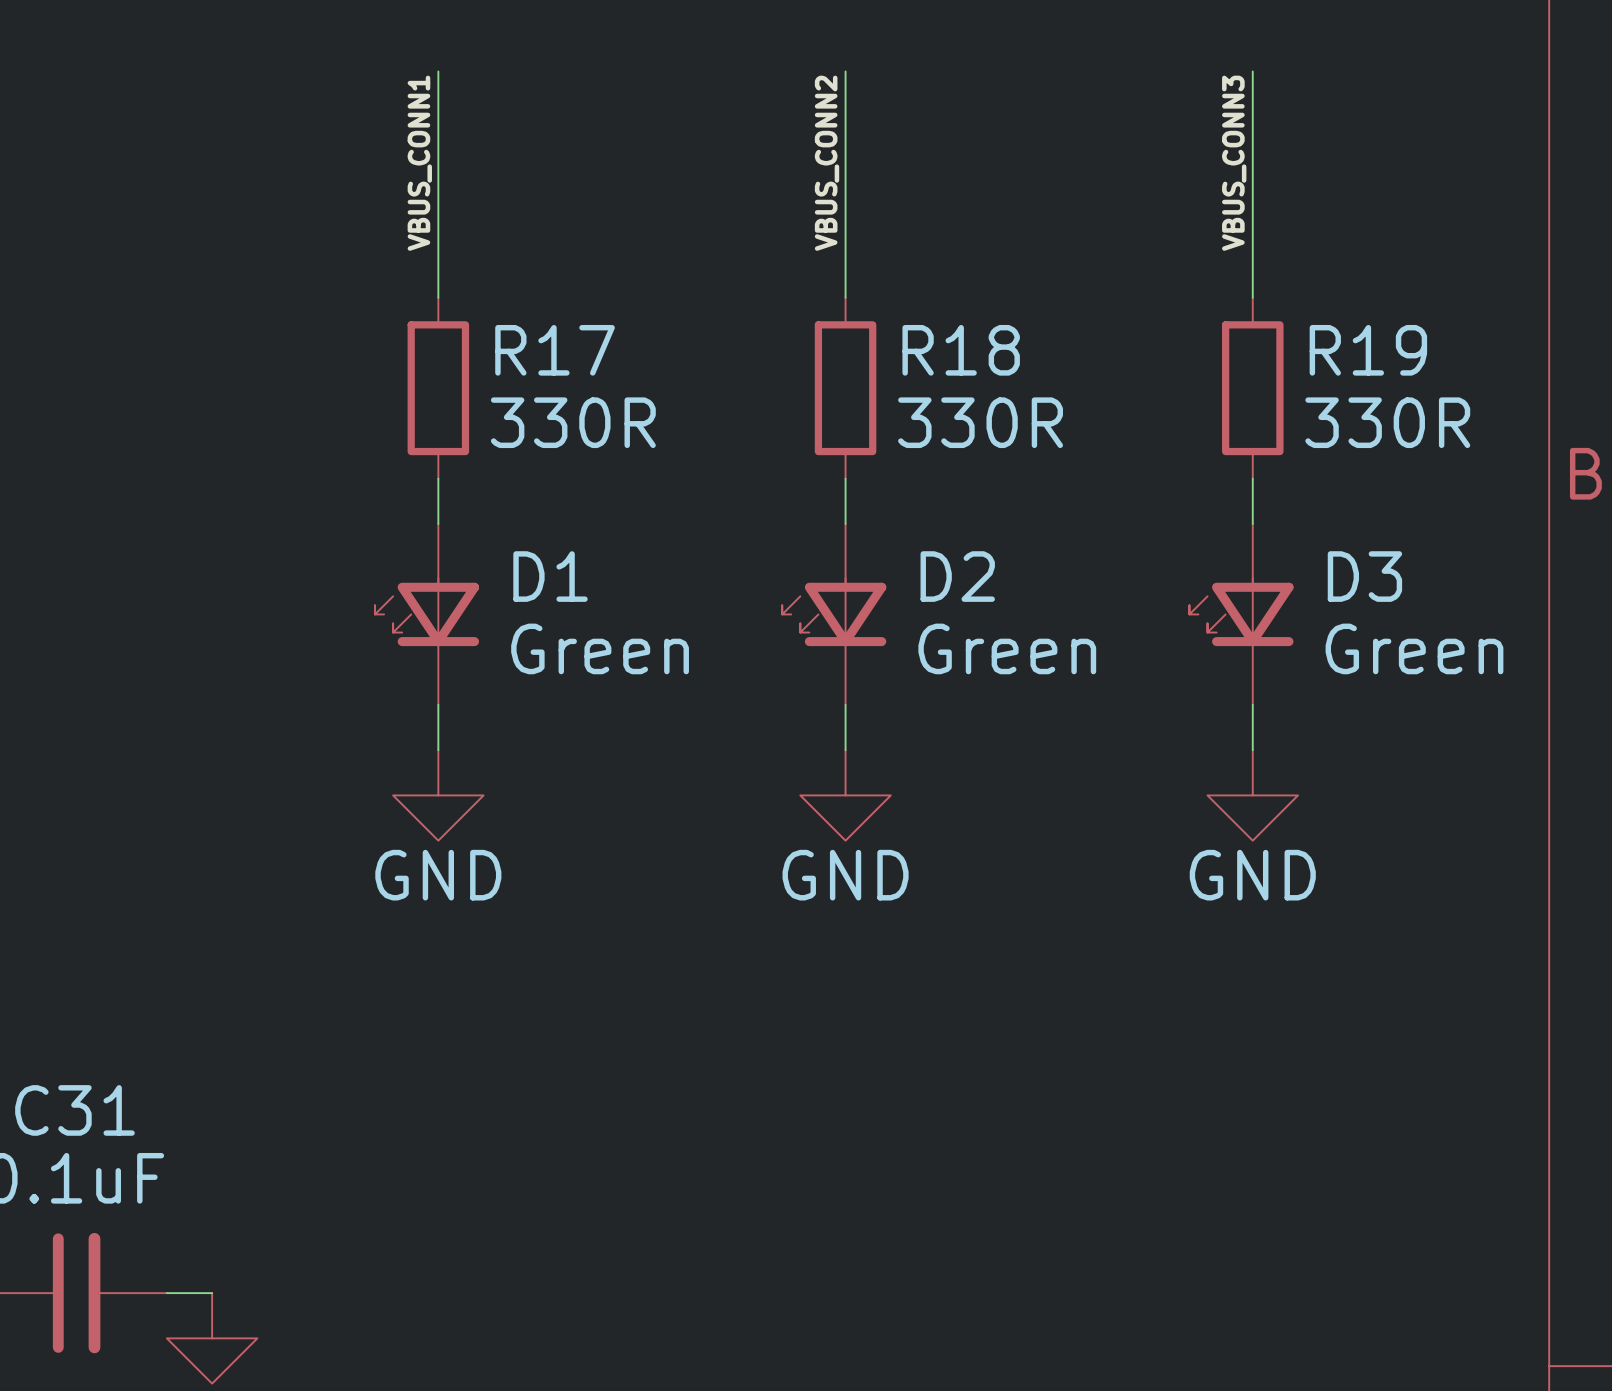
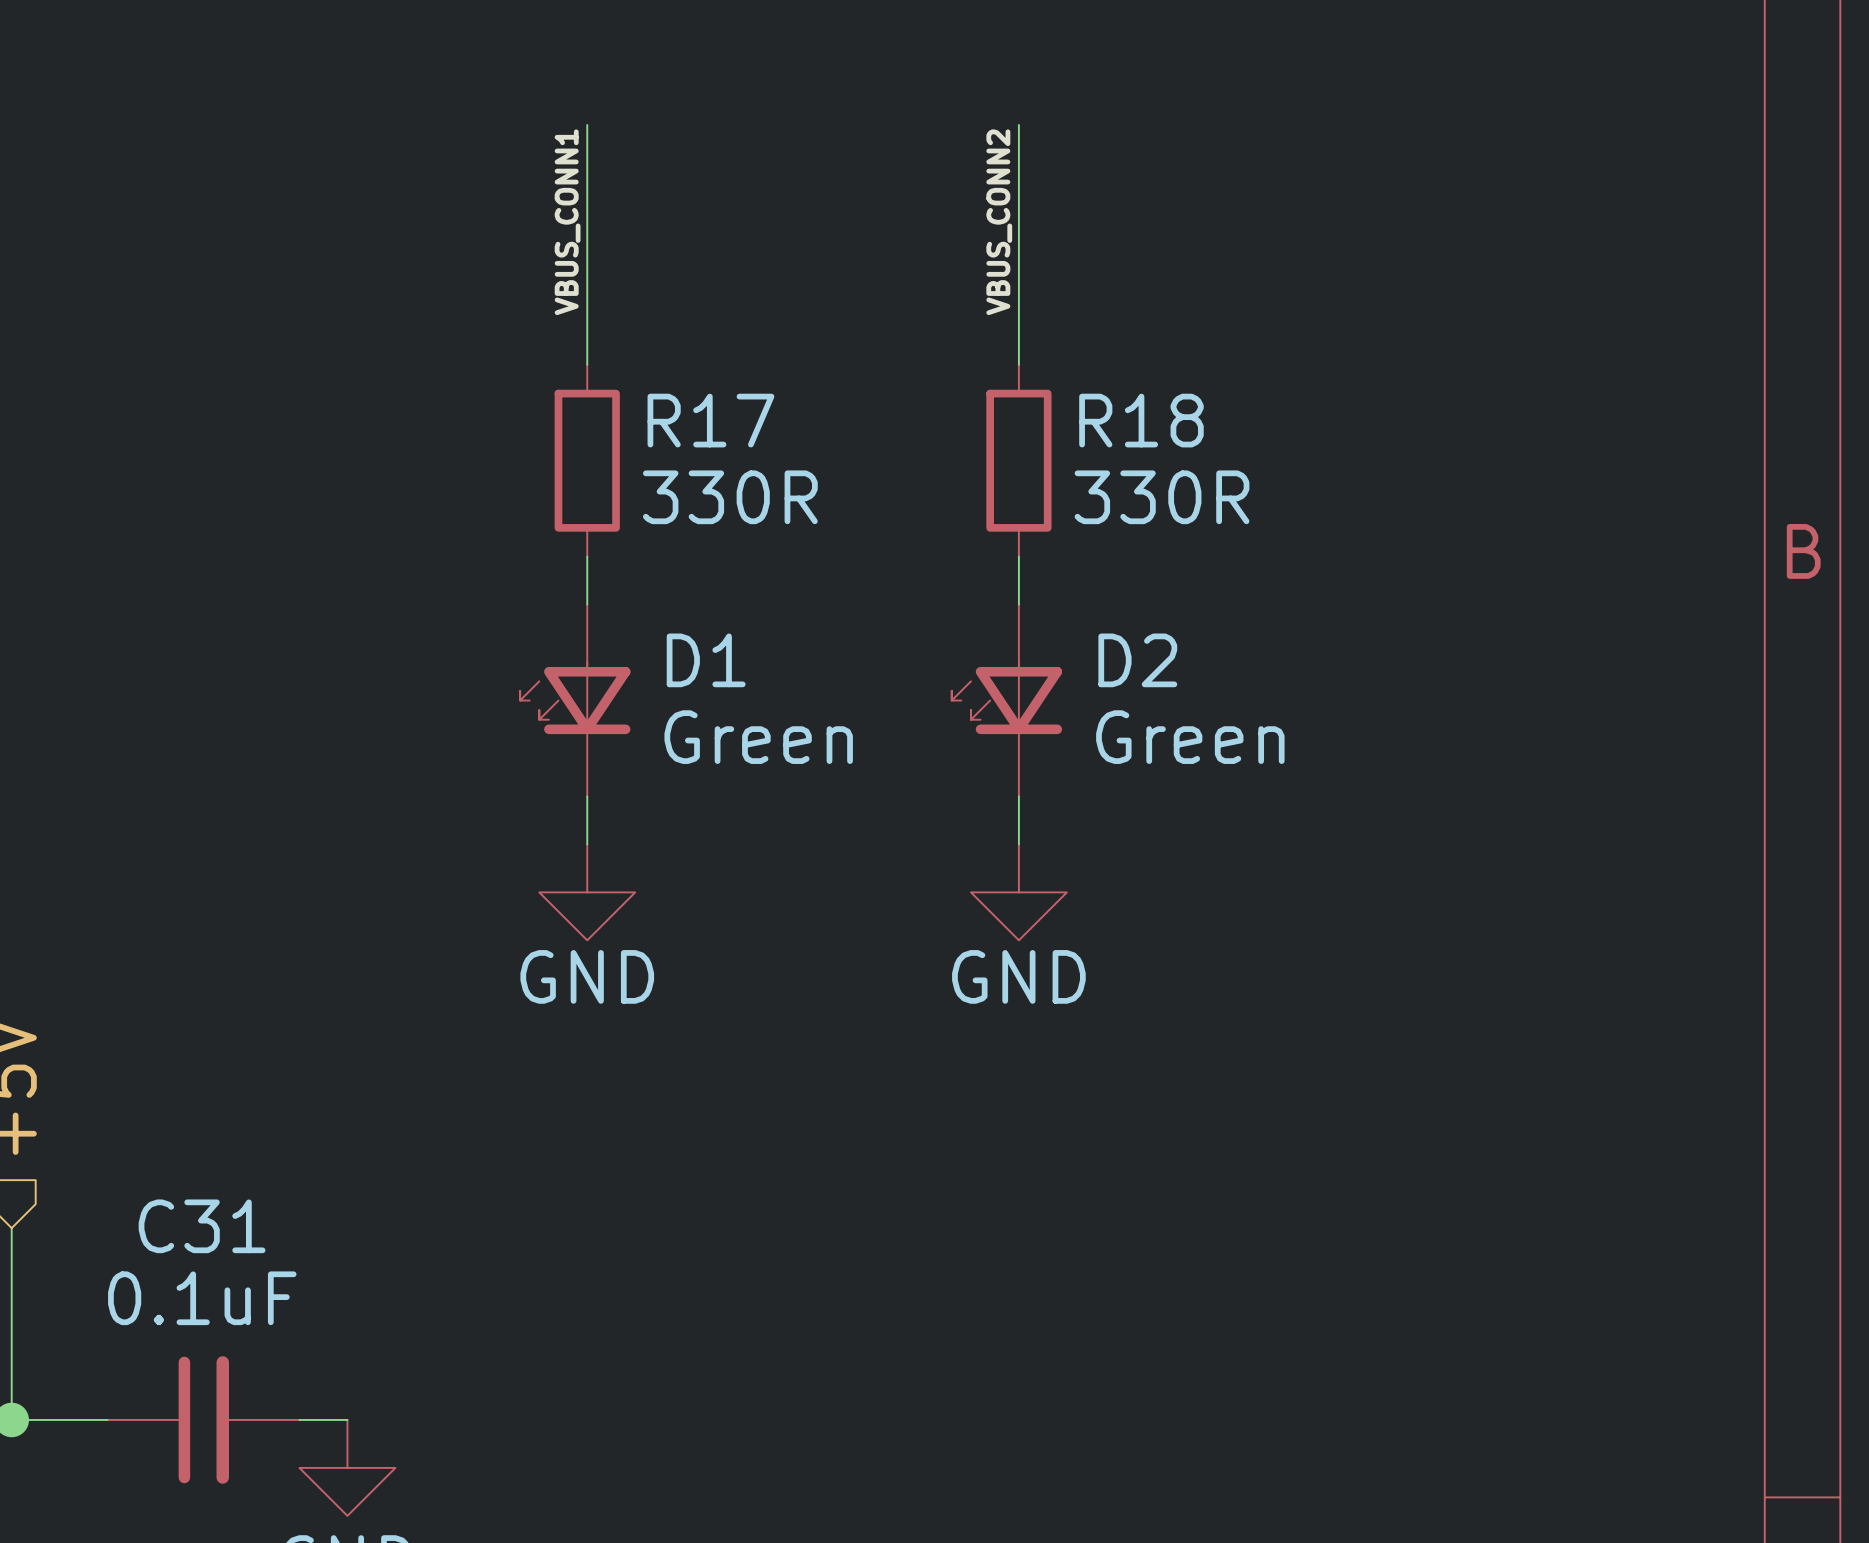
wire: (1252, 71) (1252, 297) -> none
label: VBUS_CONN3 (1234, 163) -> none
R19: 330R (1252, 388) -> none
wire: (1252, 478) (1252, 523) -> none
D3: Green (1241, 614) -> none
wire: (1252, 704) (1252, 750) -> none
power symbol: GND (1252, 795) -> none

